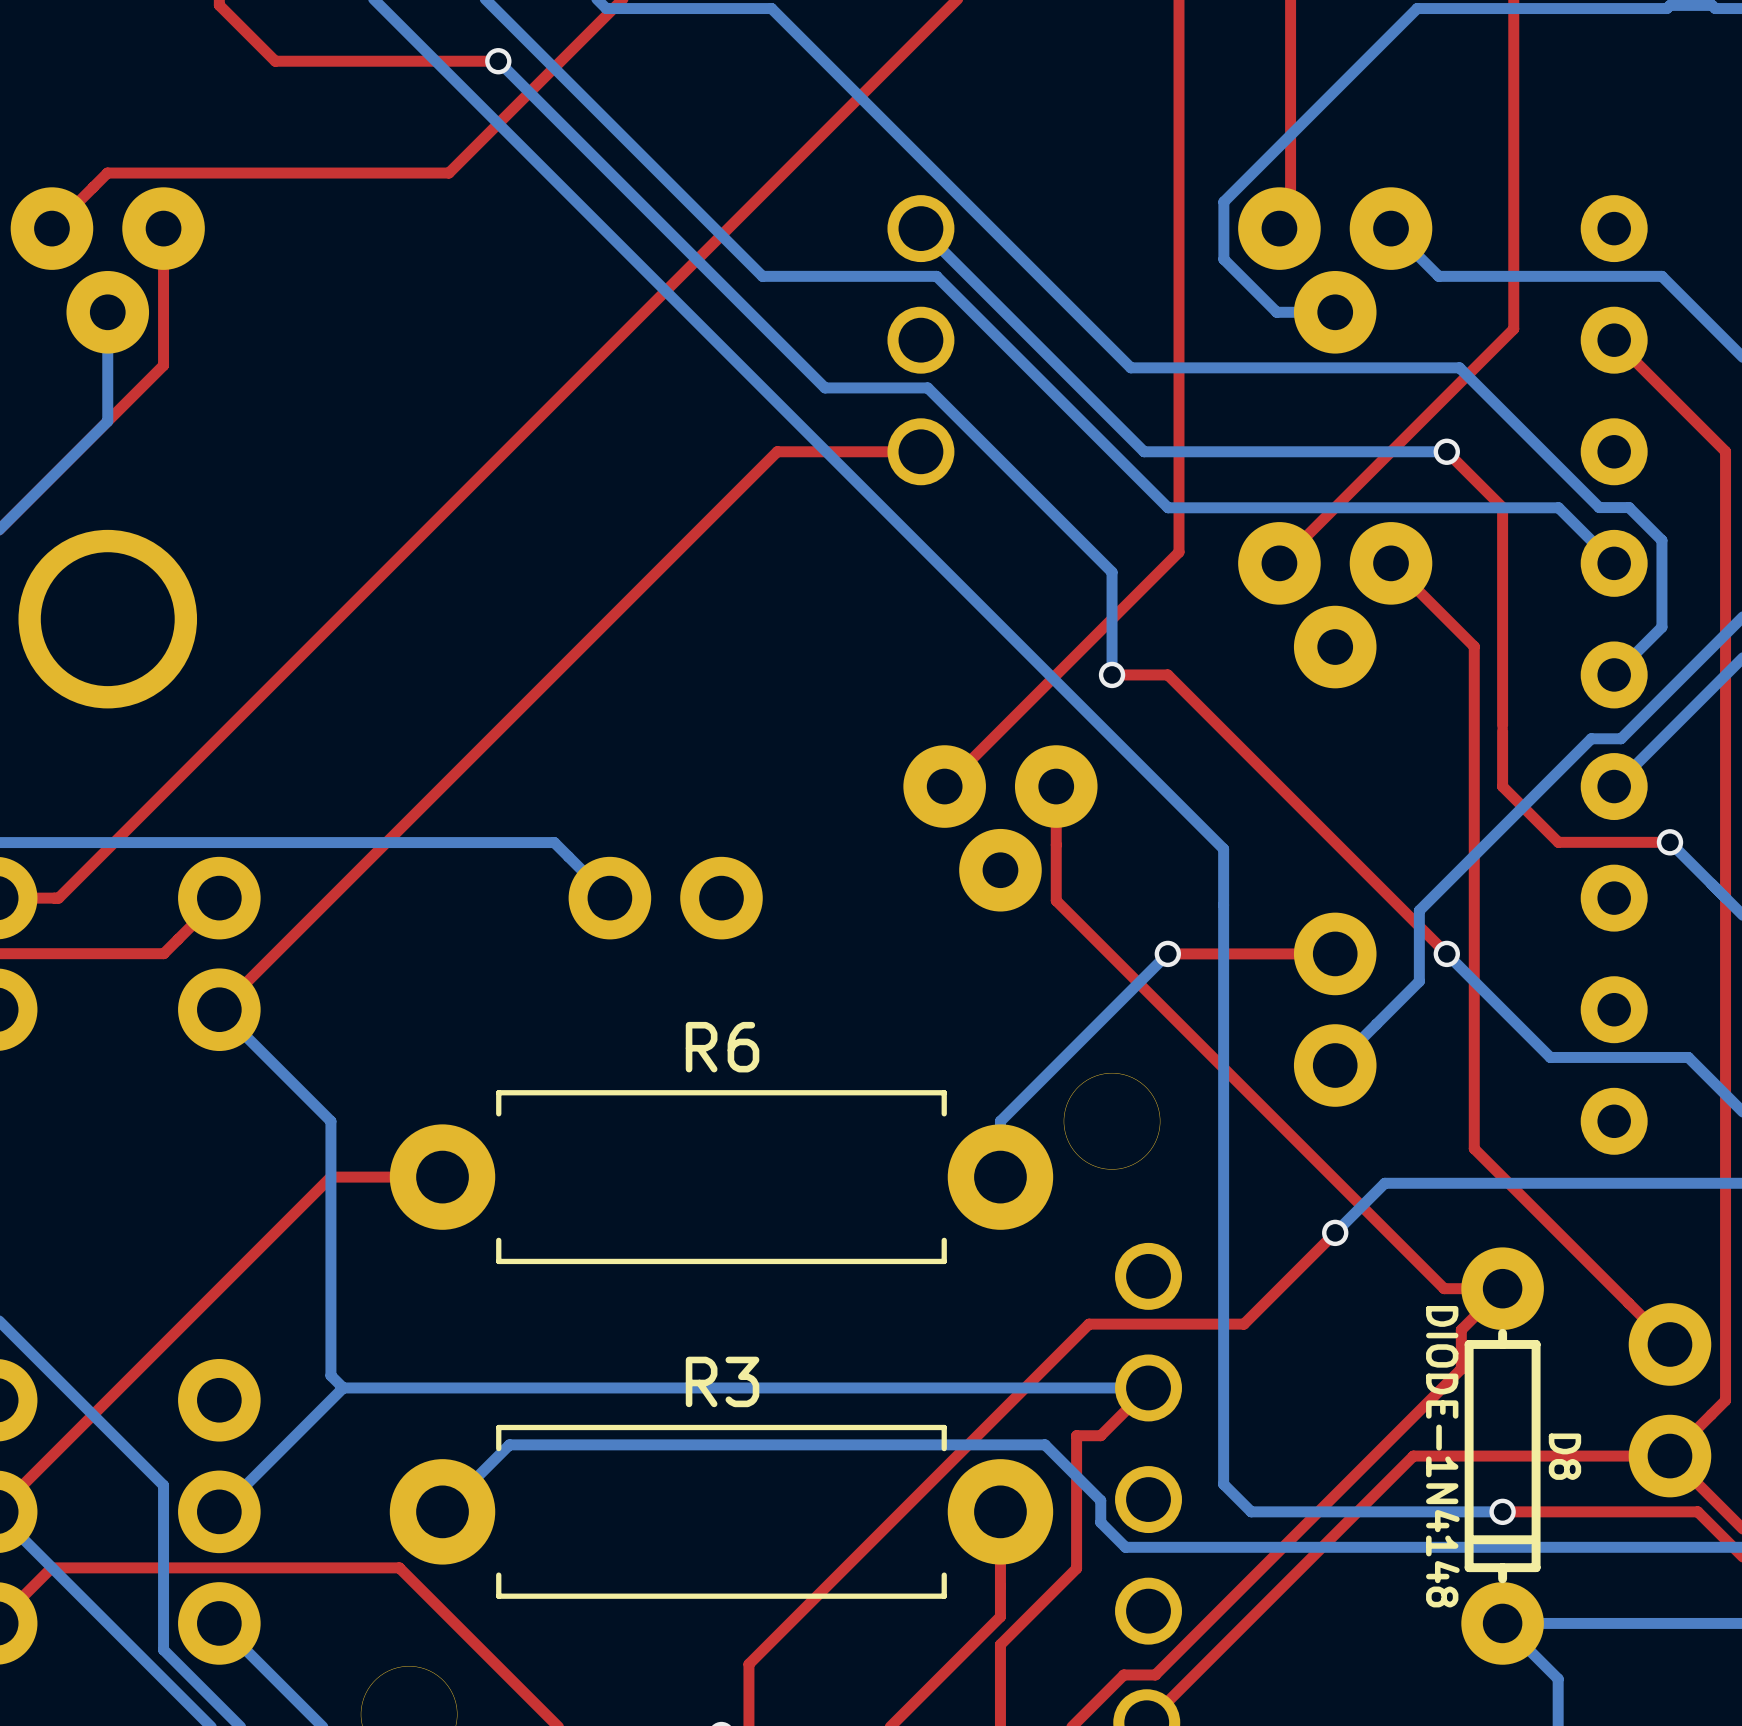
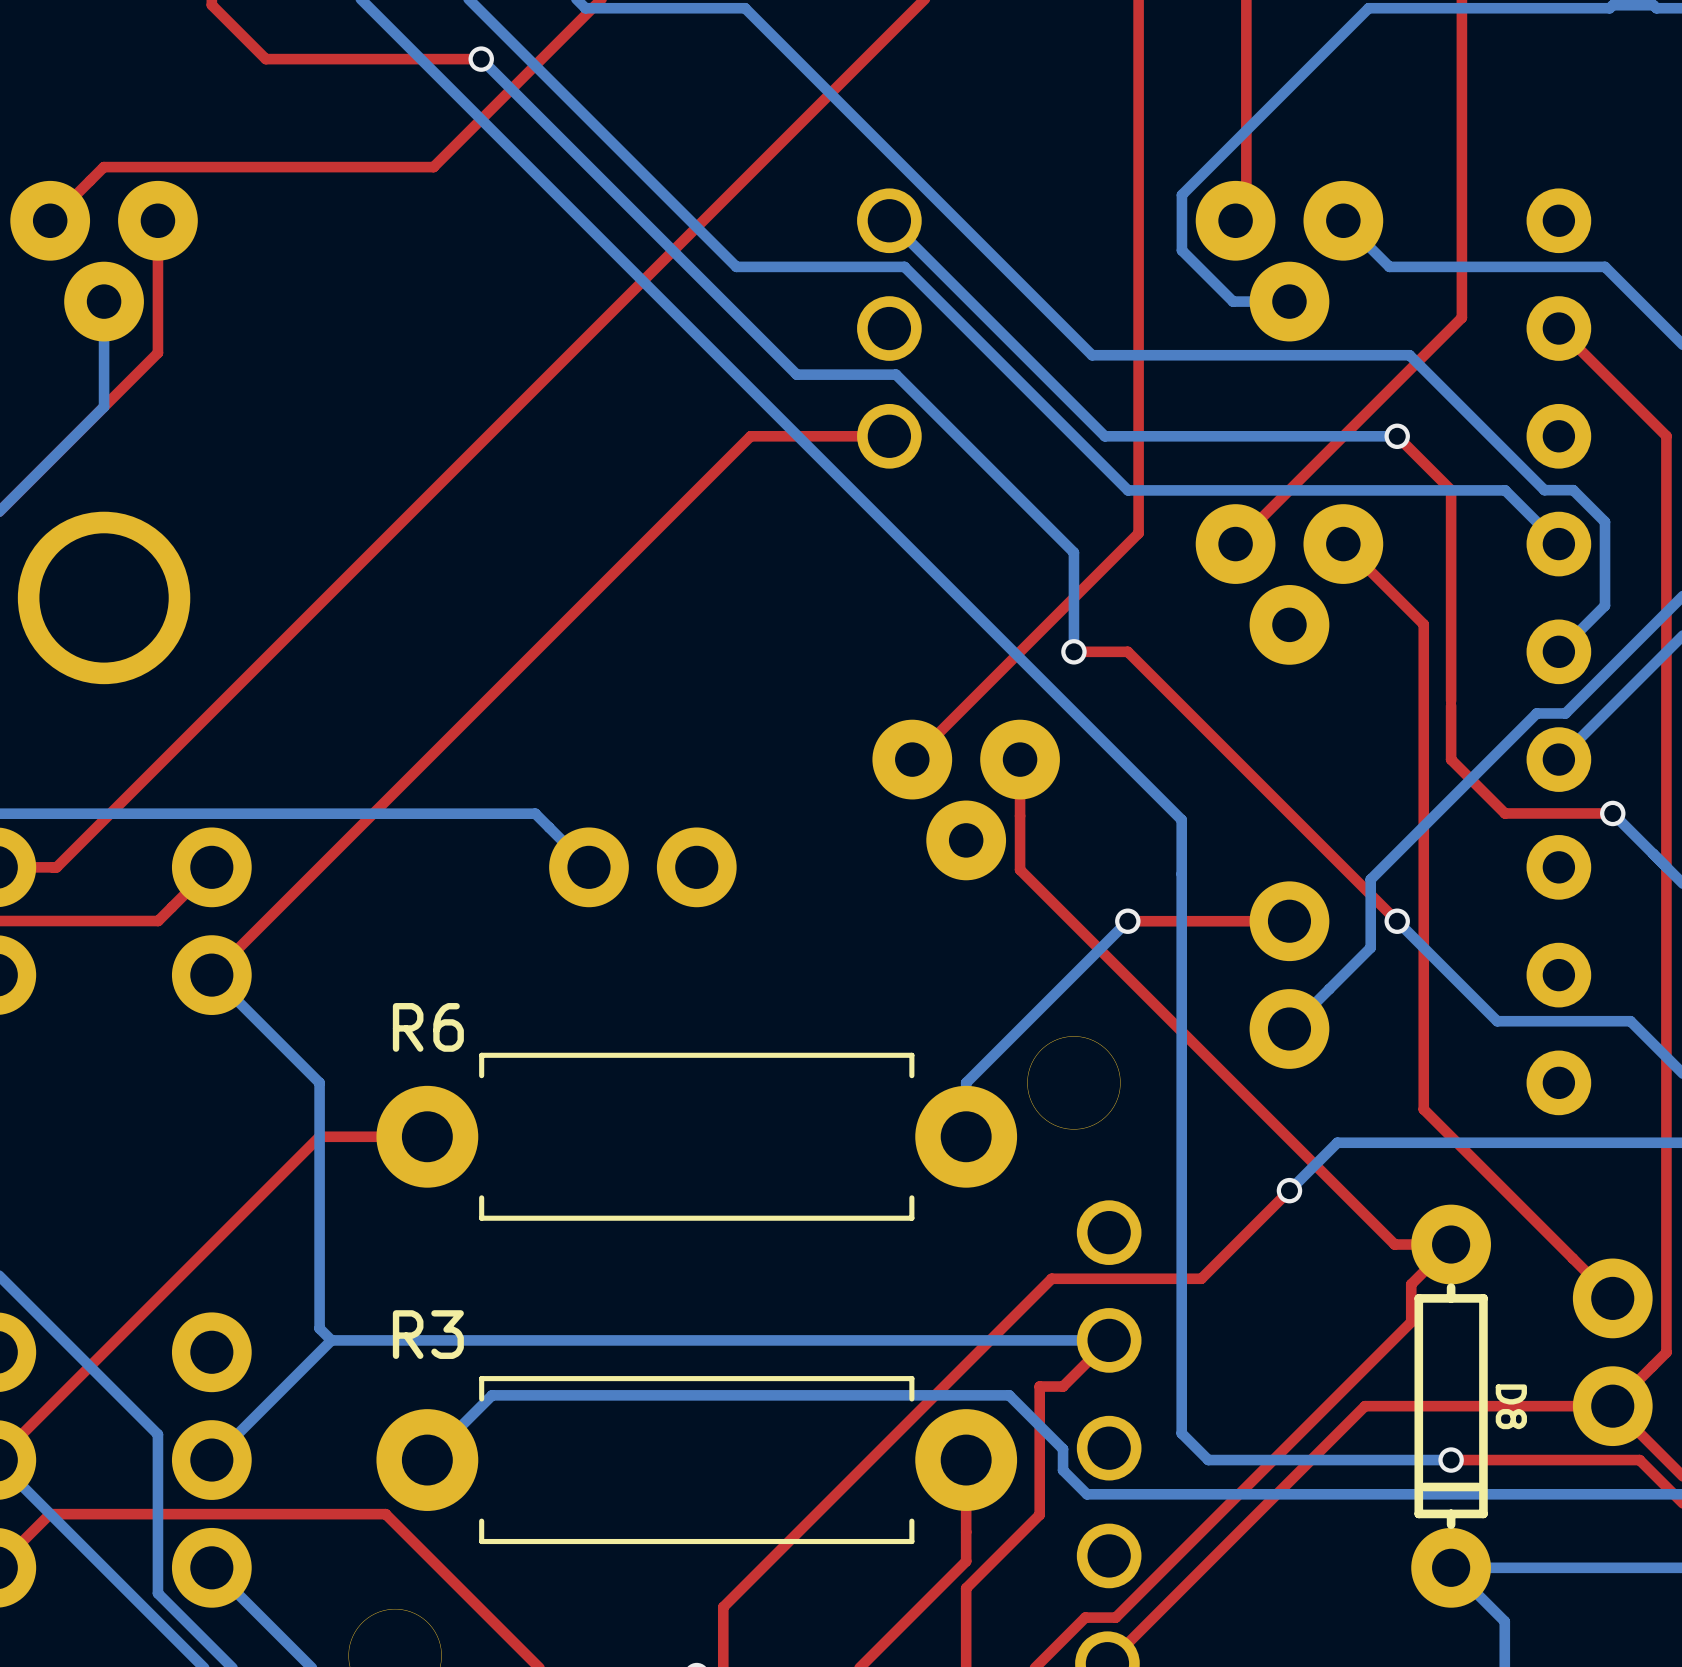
R6 name position: R6 (722, 1047) -> R6 (428, 1027)
R3 name position: R3 (722, 1381) -> R3 (428, 1334)
D8 value: DIODE-1N4148 (1442, 1456) -> none

